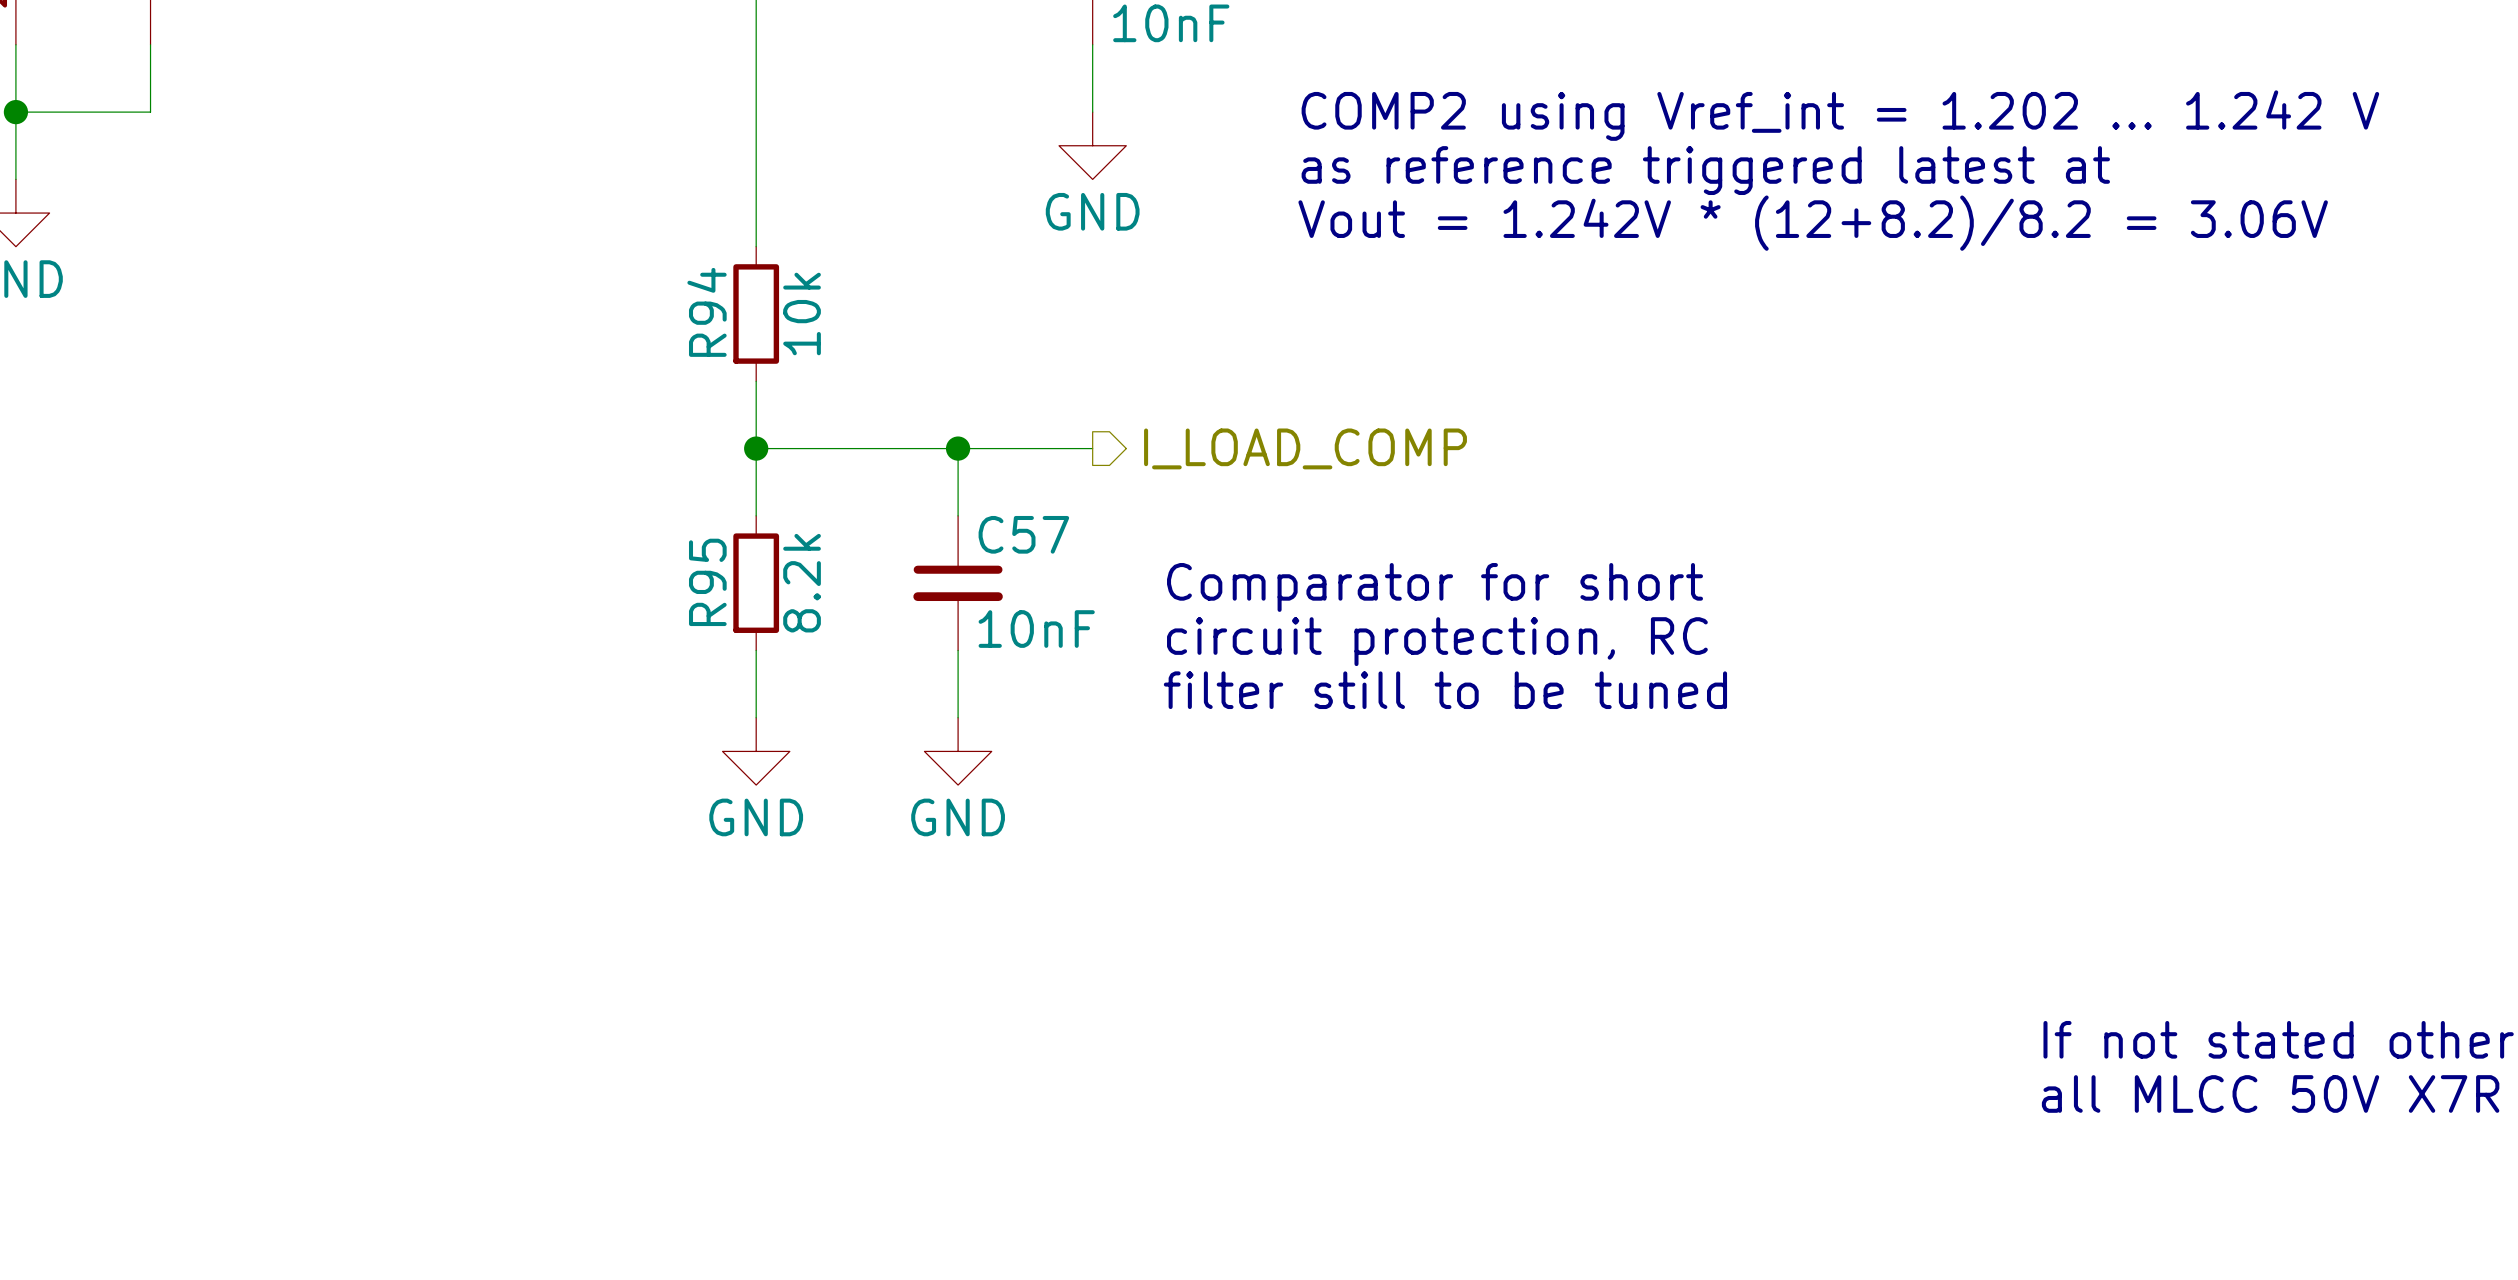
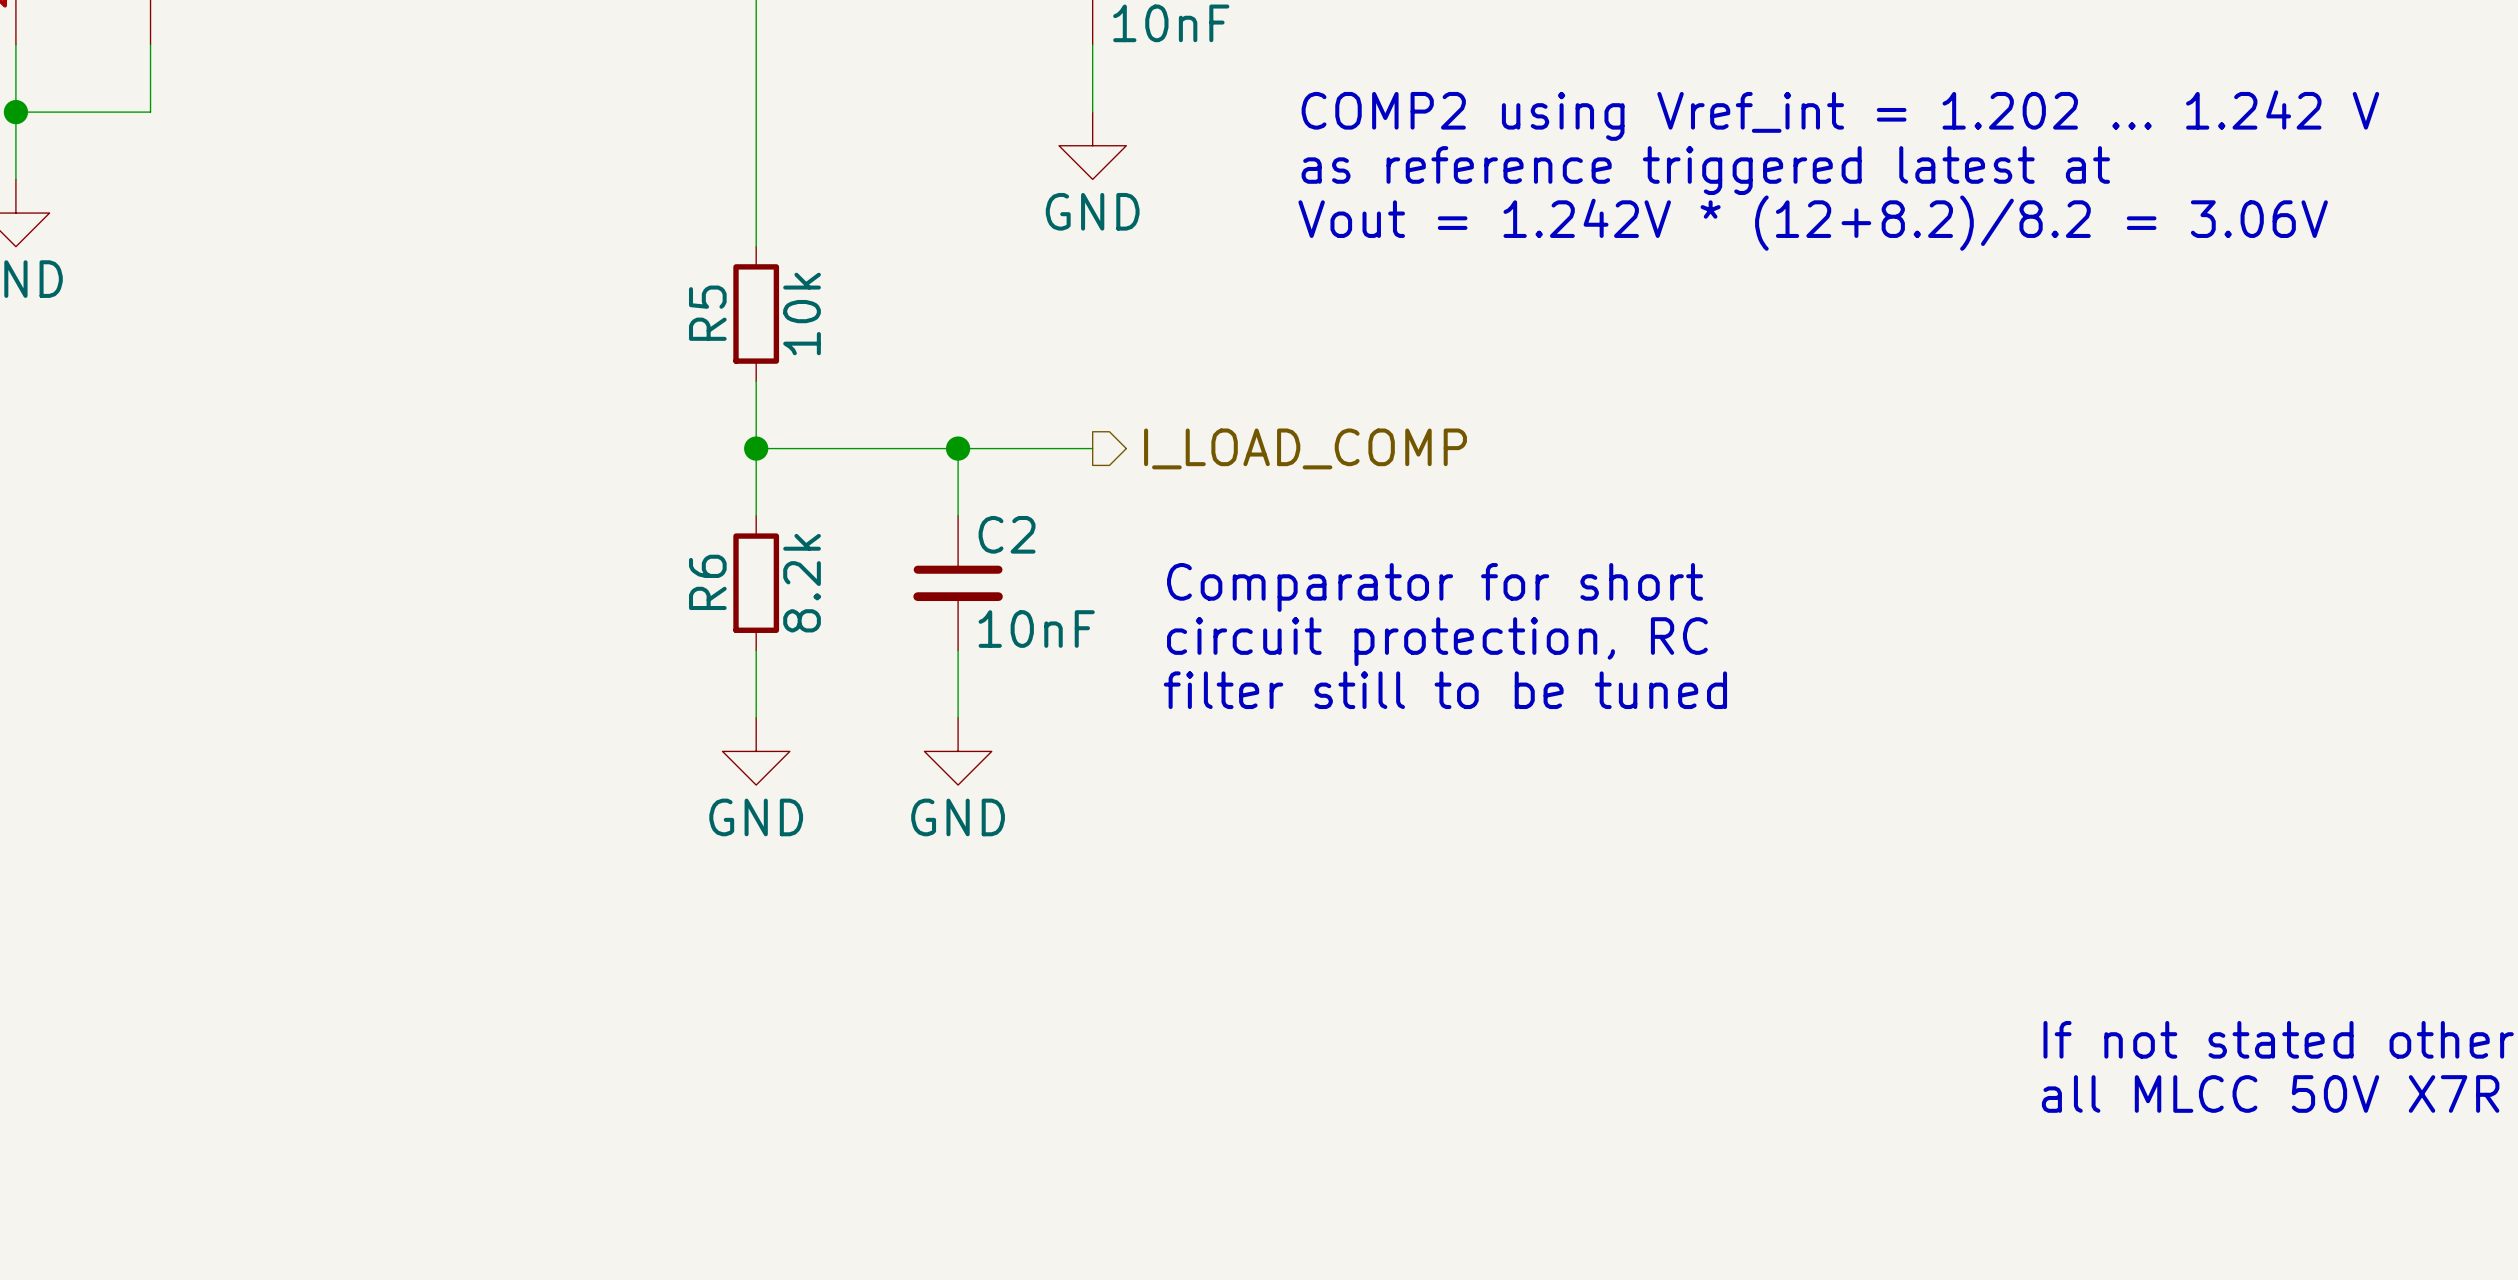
R94 name: R94 (707, 312) -> R5 (707, 313)
C57 name: C57 (1023, 534) -> C2 (1007, 534)
R95 name: R95 (707, 582) -> R6 (707, 582)

